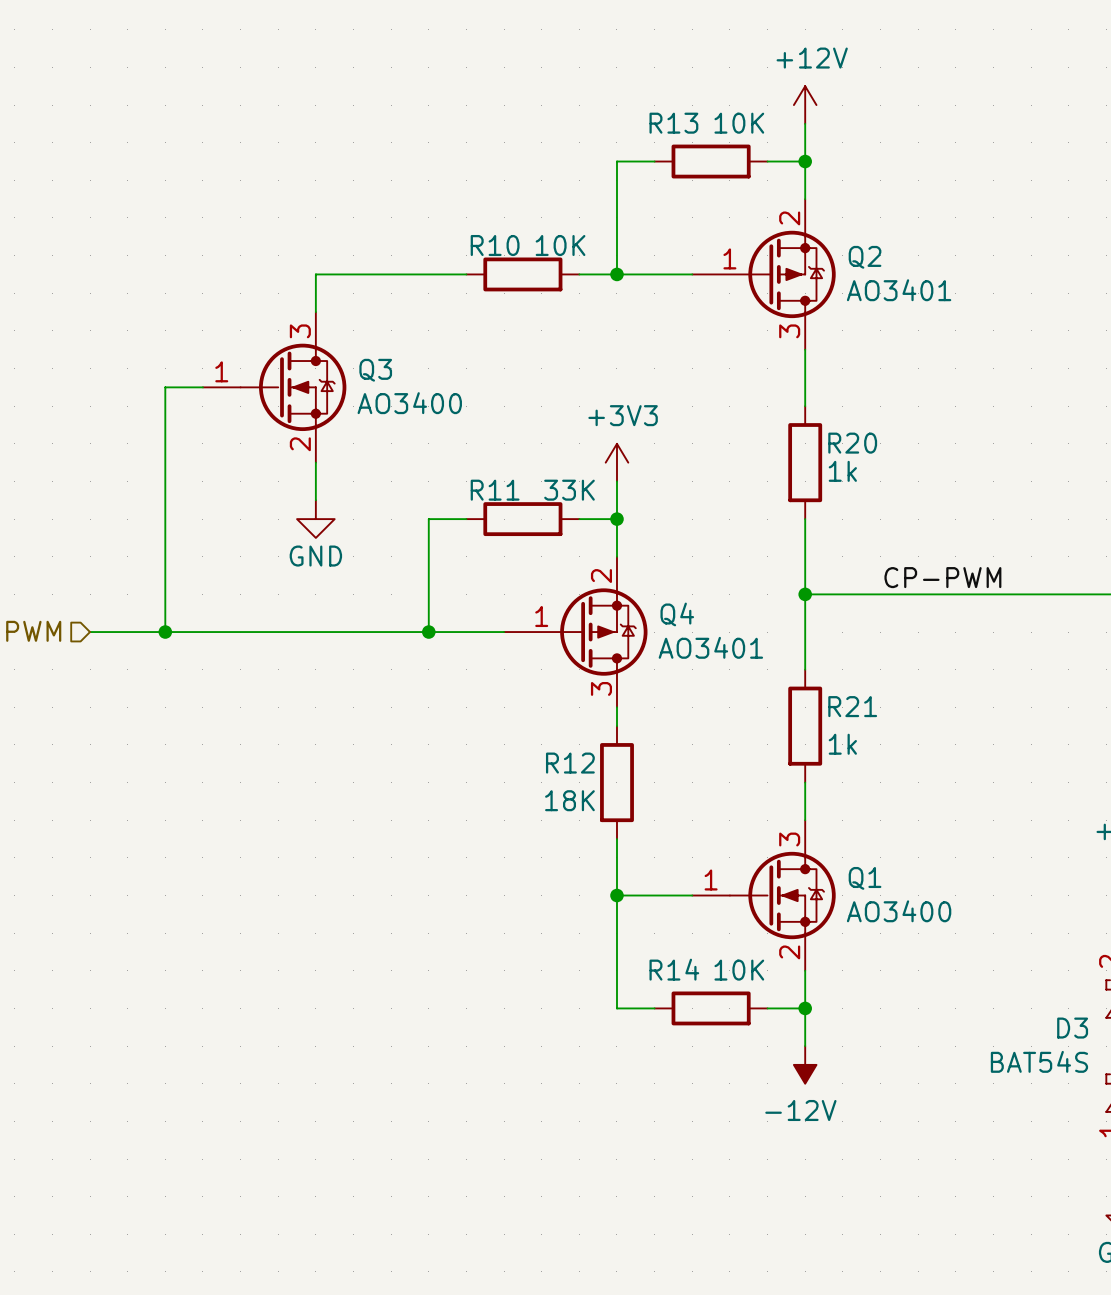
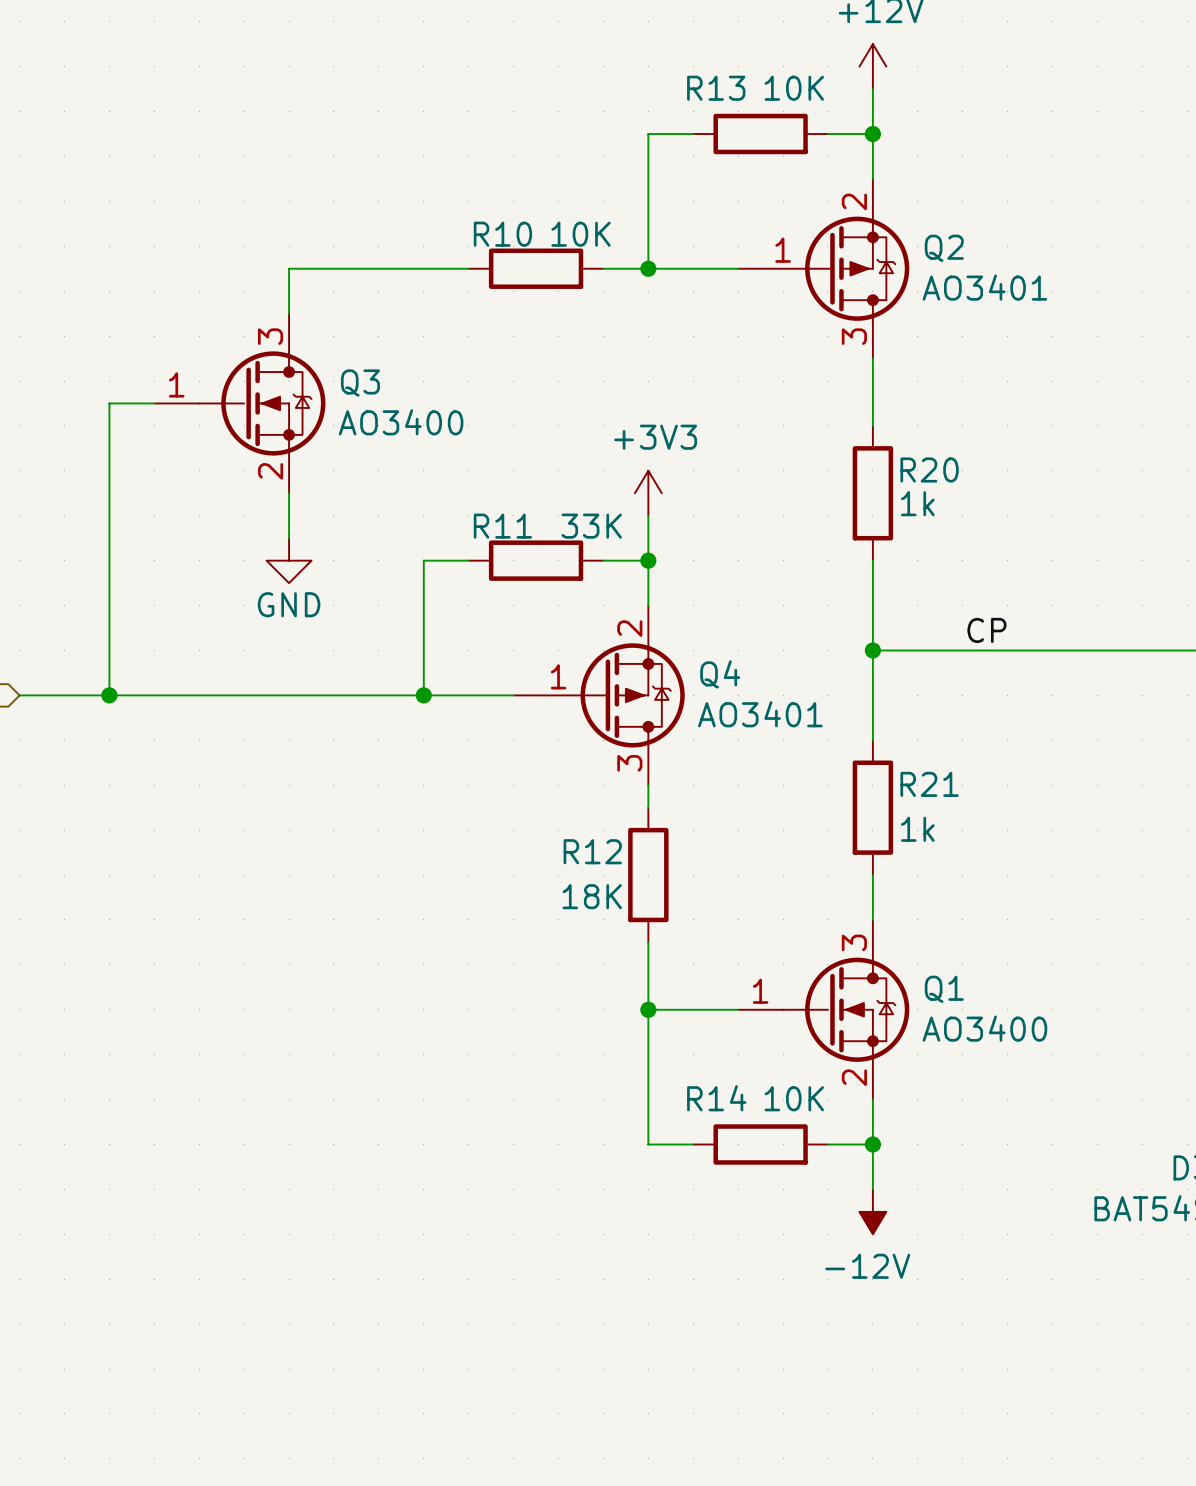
label: CP-PWM (942, 577) -> CP (986, 630)

